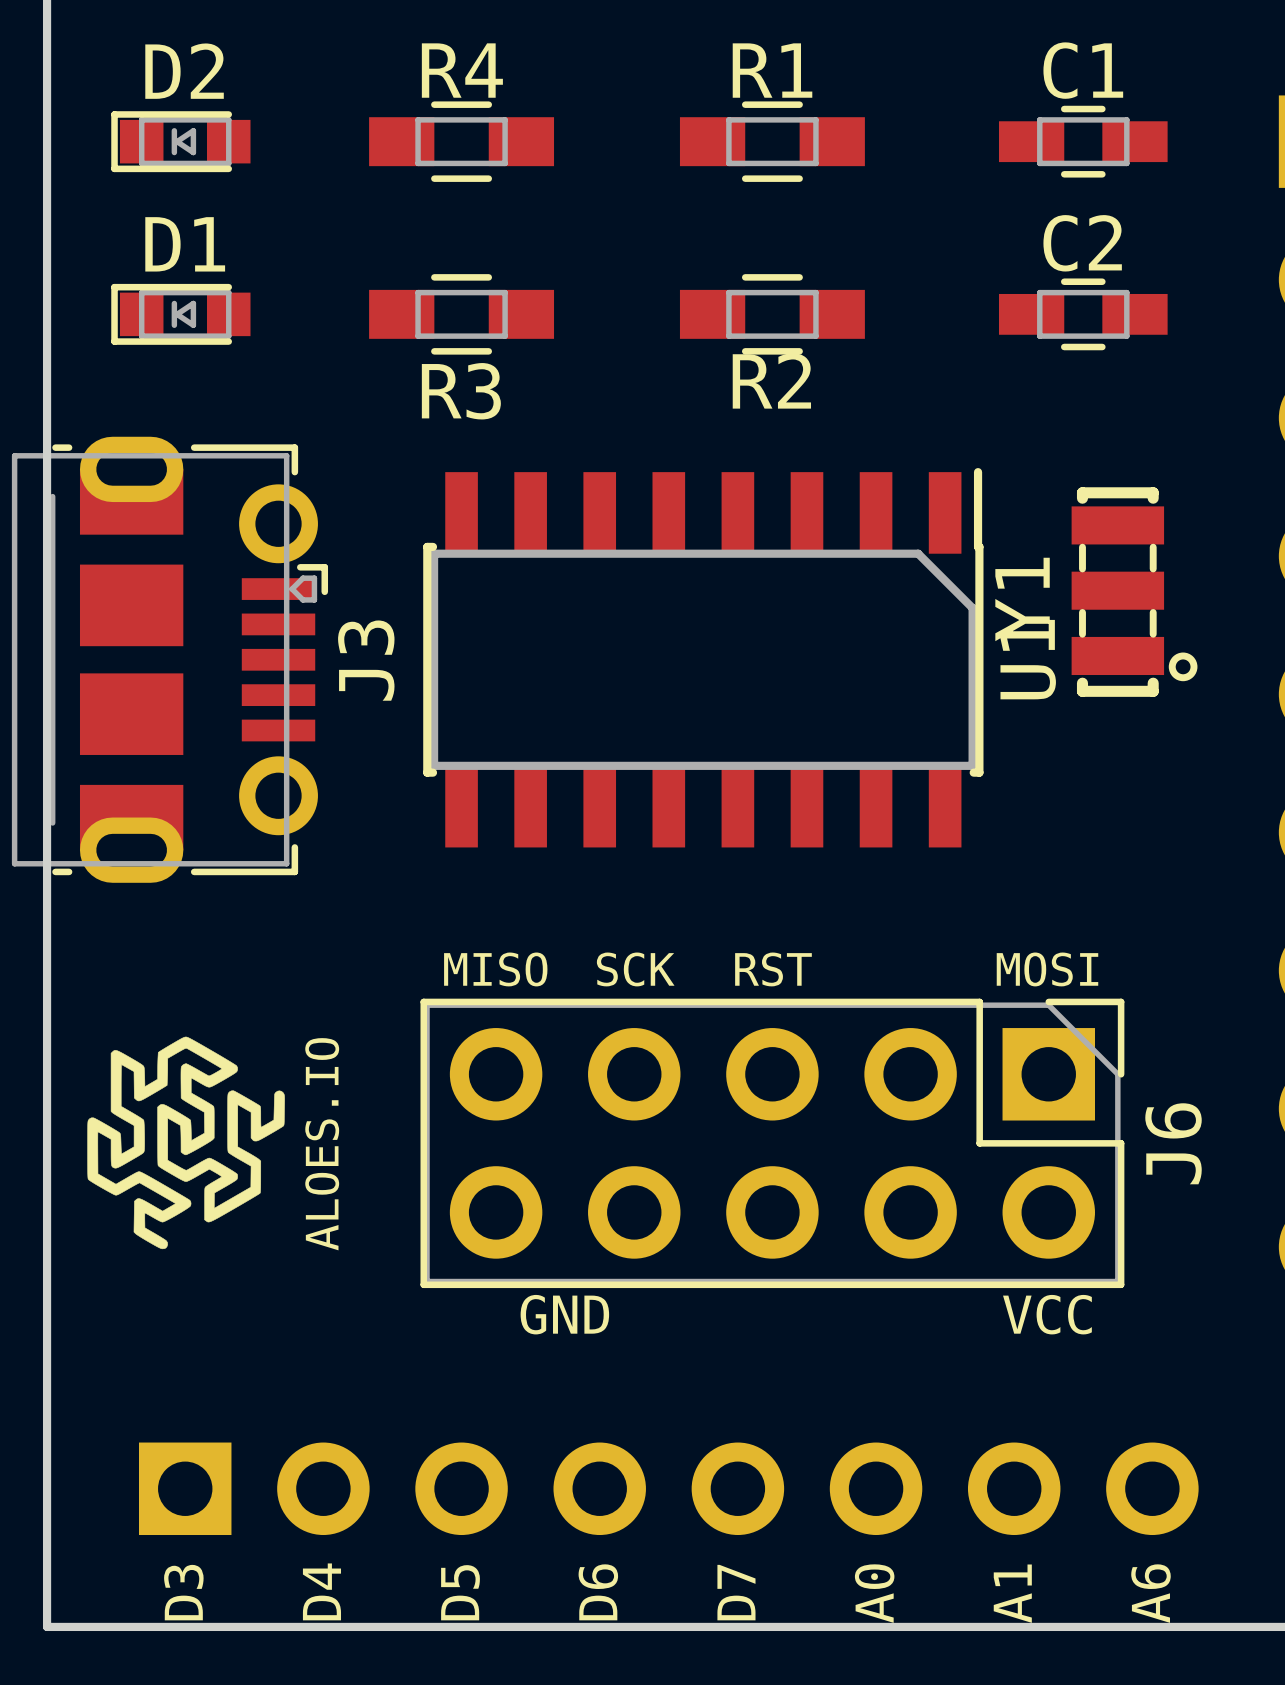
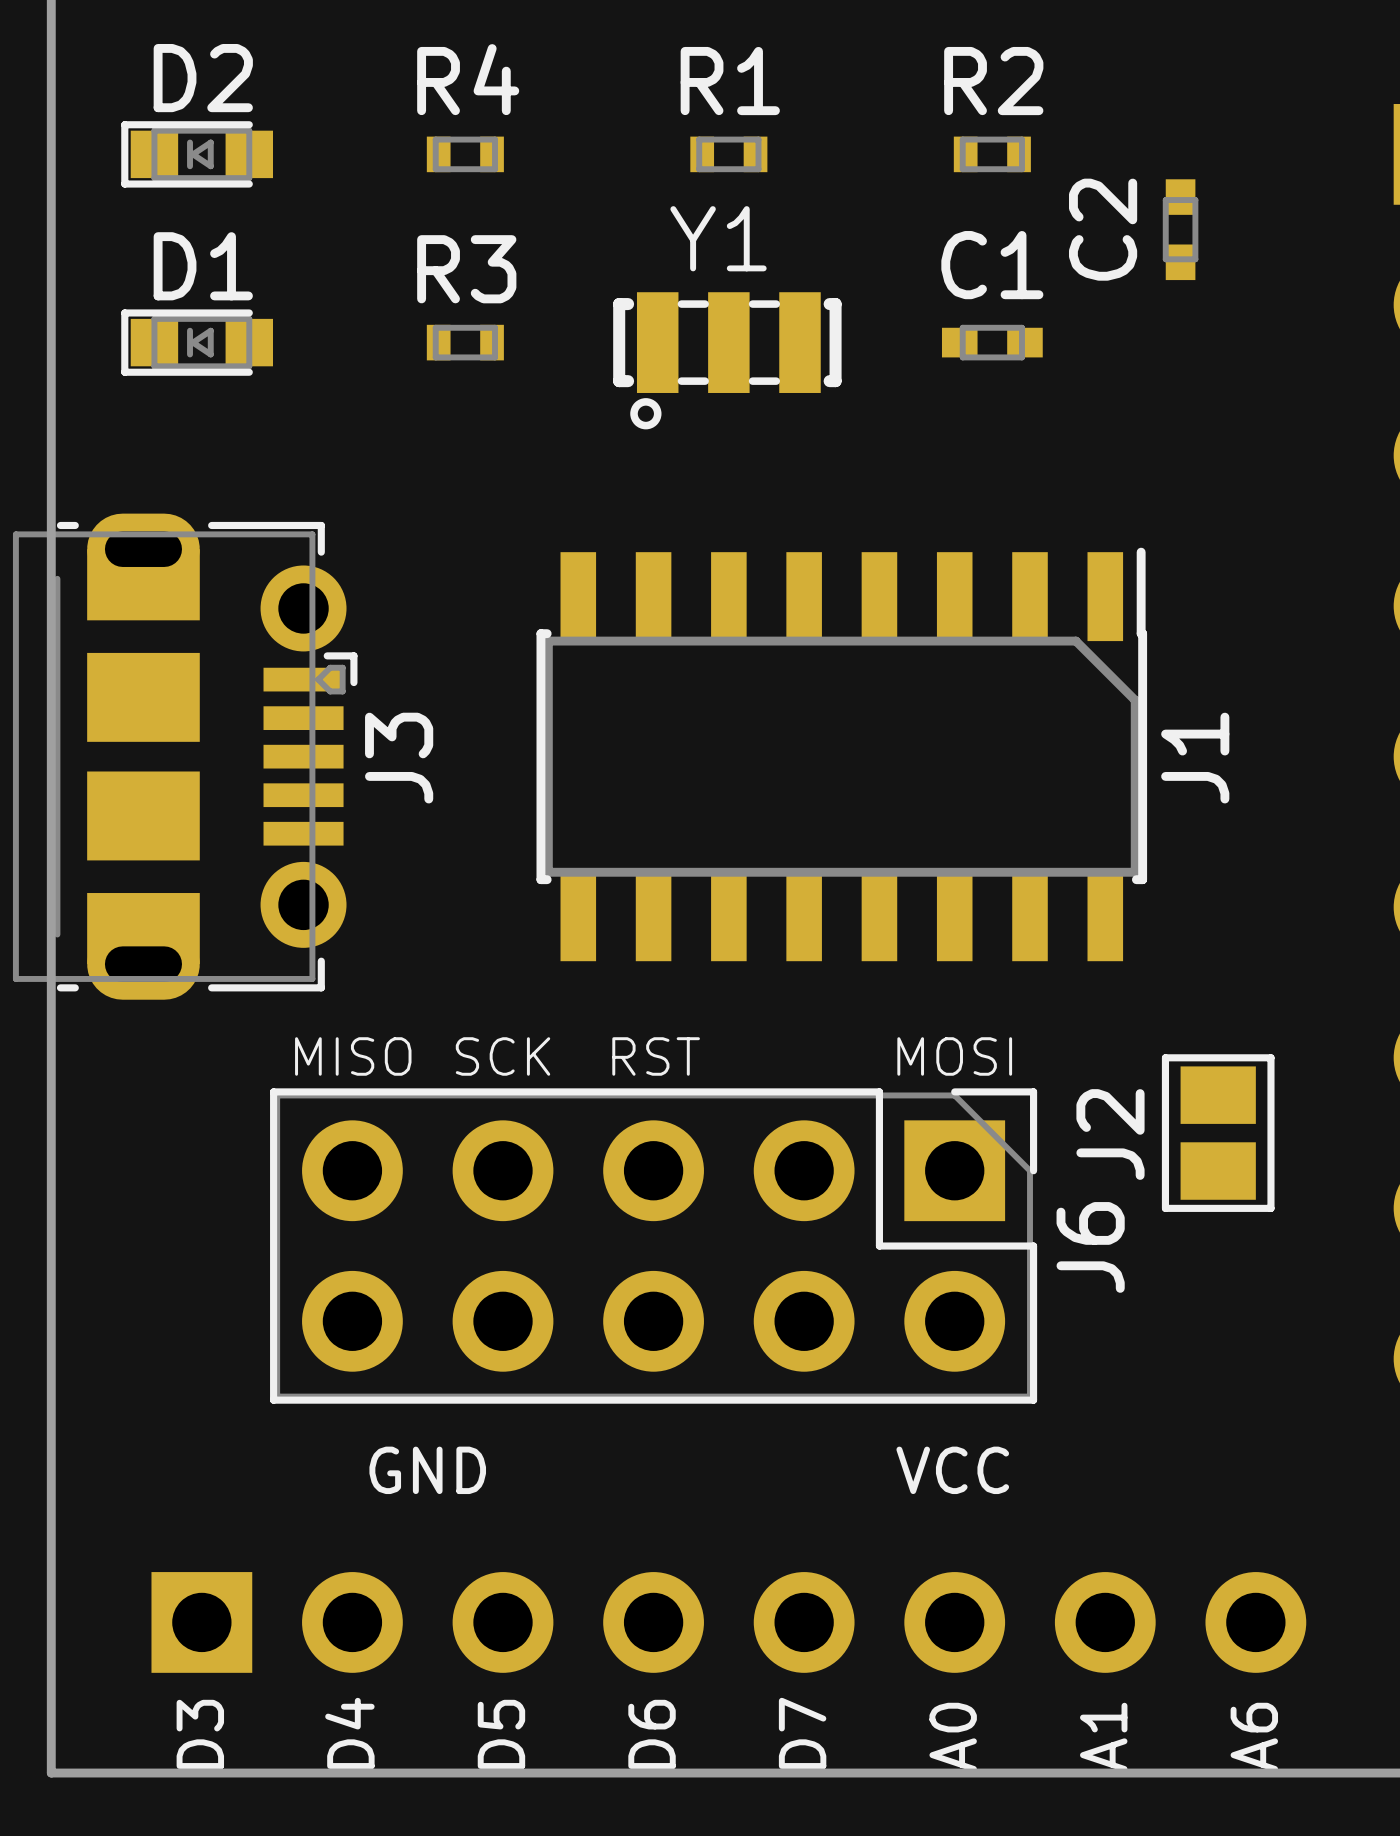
R4 footprint: [369, 101, 555, 182] -> [426, 136, 504, 173]
R1 footprint: [679, 101, 865, 182] -> [690, 136, 768, 173]
C1 footprint: [998, 105, 1168, 178] -> [941, 324, 1043, 361]
R3 footprint: [369, 274, 555, 355] -> [426, 324, 504, 361]
R2 footprint: [679, 274, 865, 355] -> [953, 136, 1031, 173]
C2 footprint: [998, 278, 1168, 351] -> [1162, 179, 1199, 281]
R2 name position: R2 (771, 380) -> R2 (993, 81)
R3 name position: R3 (461, 391) -> R3 (466, 269)
Y1 rotation: 0° (1134, 592) -> 90° clockwise (727, 360)
Y1 position: (1134, 592) -> (727, 360)
U1: (703, 657) -> none
J3 position: (169, 659) -> (185, 756)
J1: none -> (841, 754)
text position: MISO (495, 969) -> MISO (353, 1056)
text position: SCK (635, 969) -> SCK (503, 1056)
text position: RST (773, 969) -> RST (656, 1056)
text position: MOSI (1047, 969) -> MOSI (954, 1056)
drawing: [87, 1036, 285, 1250] -> none
J2: none -> (1218, 1133)
J6 position: (772, 1143) -> (653, 1246)
text: ALOES.IO (322, 1144) -> none
text position: GND (564, 1314) -> GND (427, 1470)
text position: VCC (1047, 1314) -> VCC (952, 1470)

